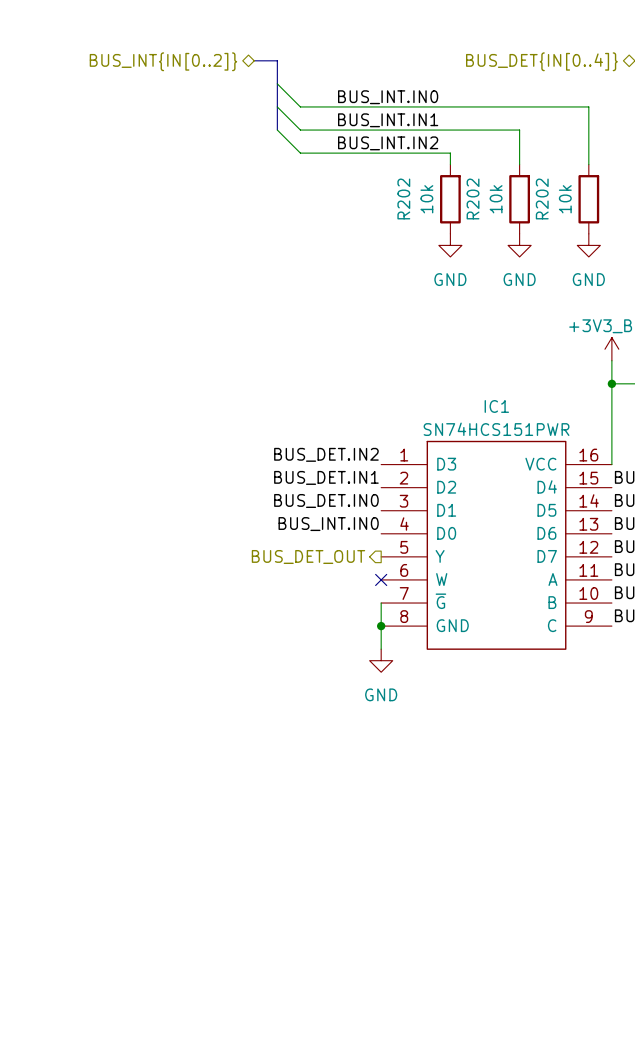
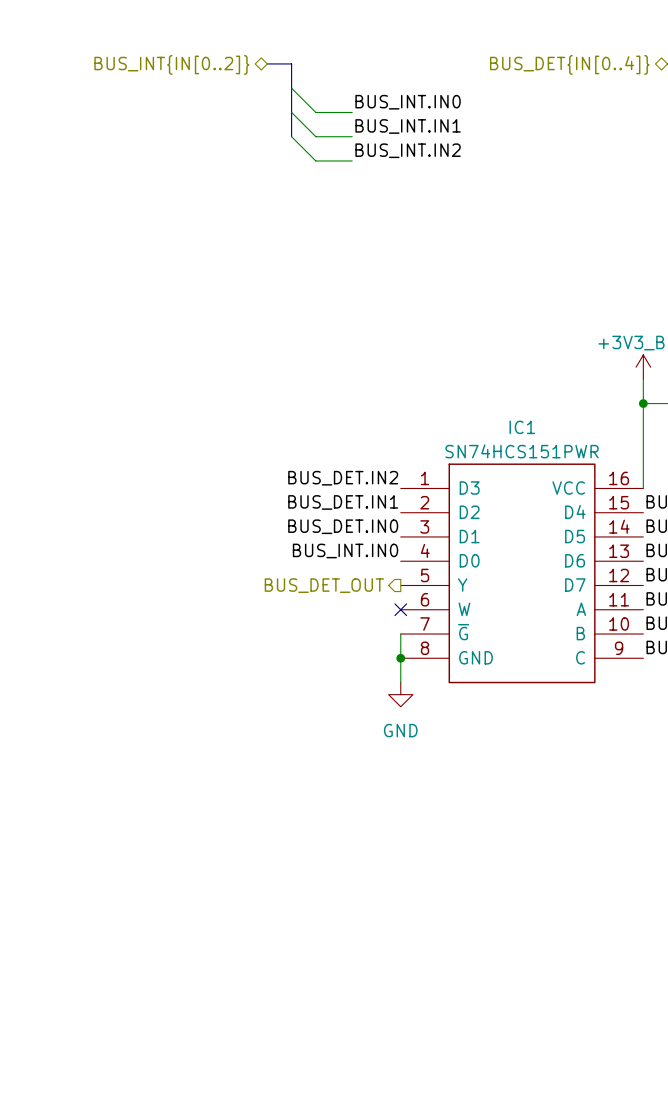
wire: (335, 106) (588, 106) (588, 164) -> none
wire: (335, 130) (519, 130) (519, 164) -> none
wire: (335, 153) (450, 153) (450, 164) -> none
R202: 10k (450, 199) -> none
R202: 10k (519, 199) -> none
R202: 10k (588, 199) -> none
power symbol: GND (450, 245) -> none
power symbol: GND (519, 245) -> none
power symbol: GND (588, 245) -> none

